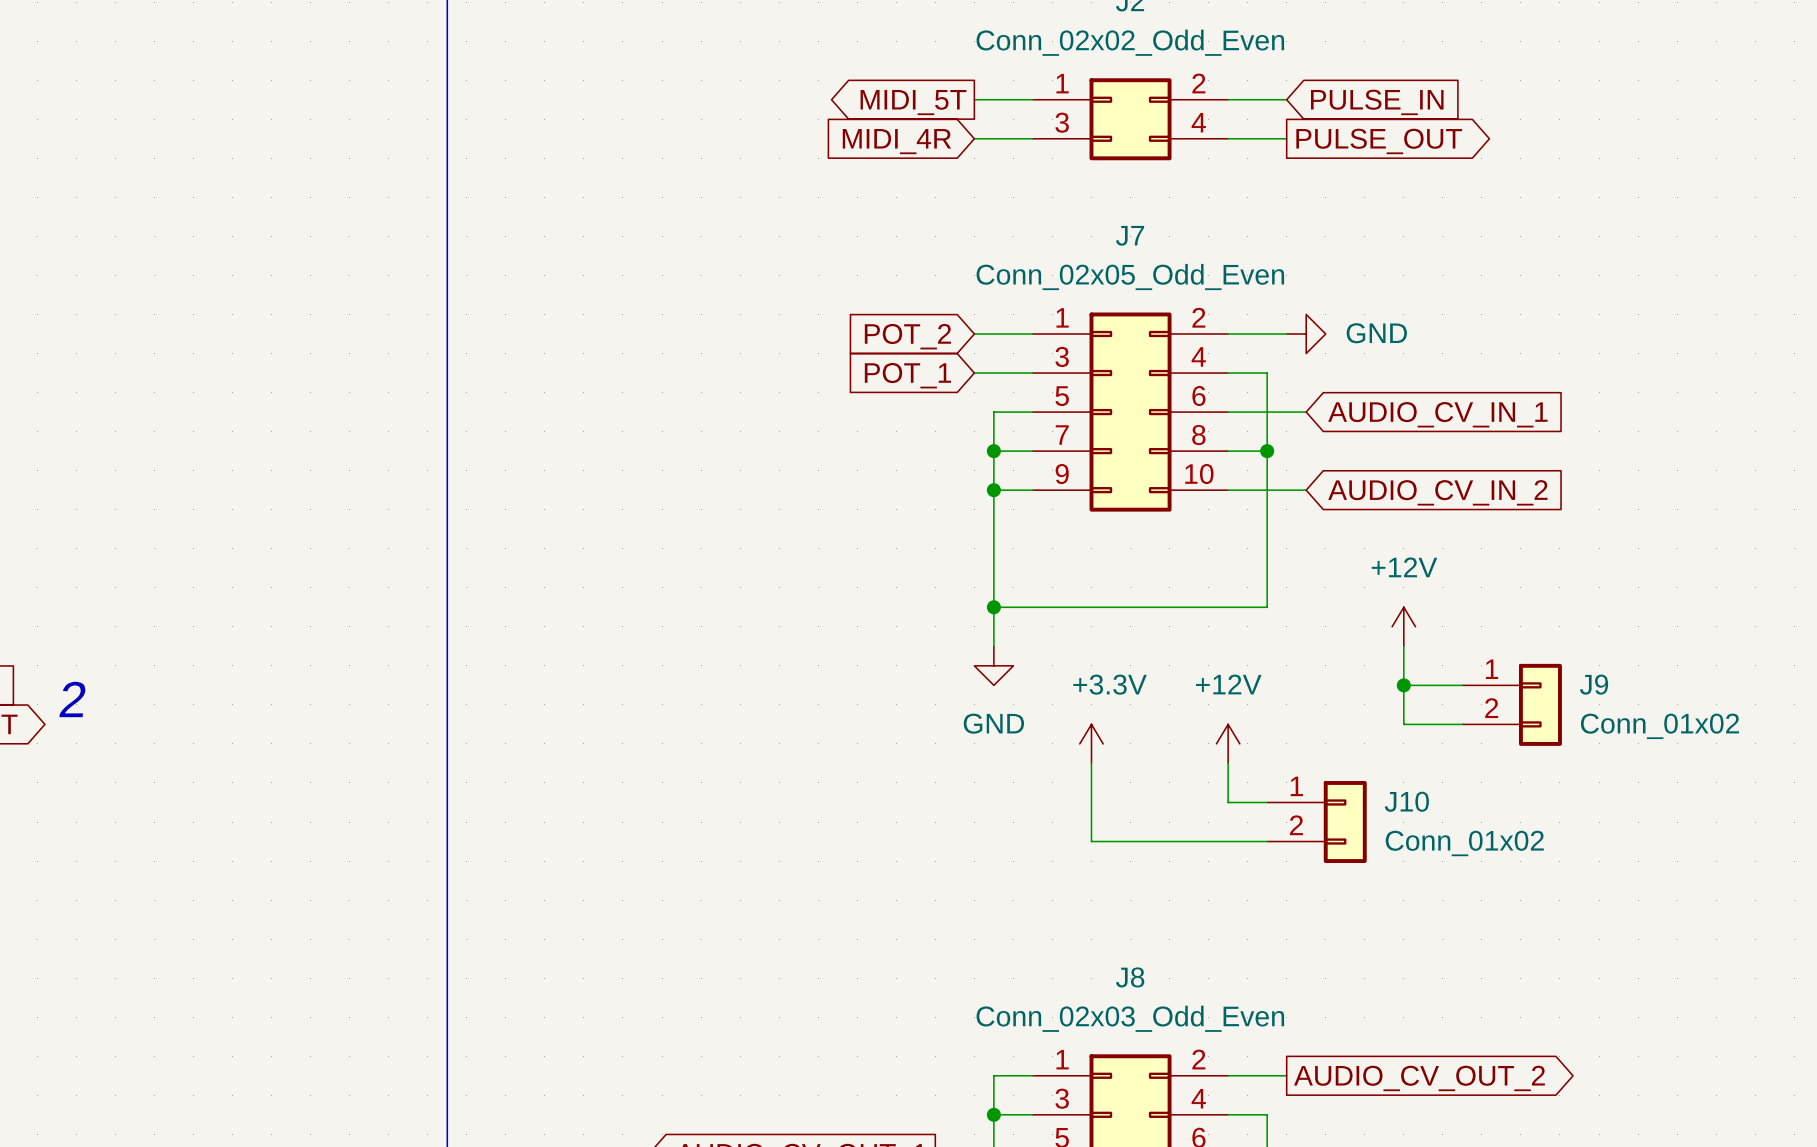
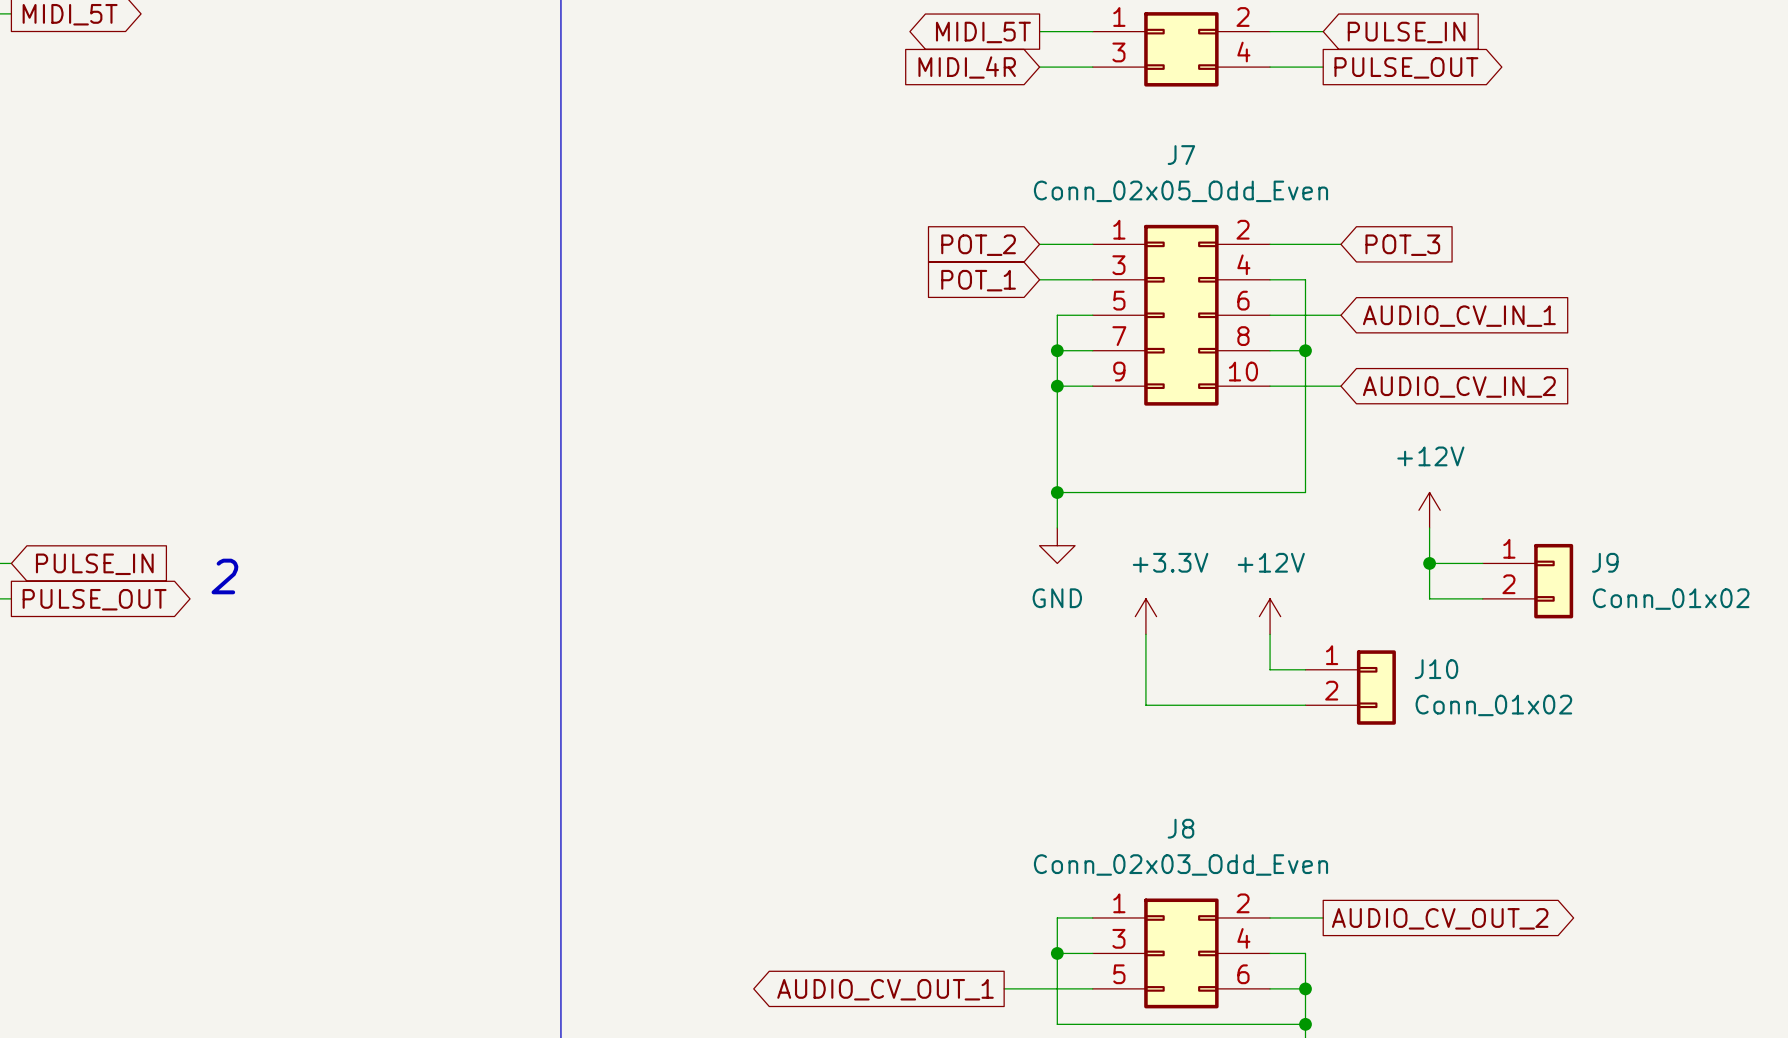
power symbol: GND (1306, 333) -> none
global label: none -> POT_3 (1402, 245)

